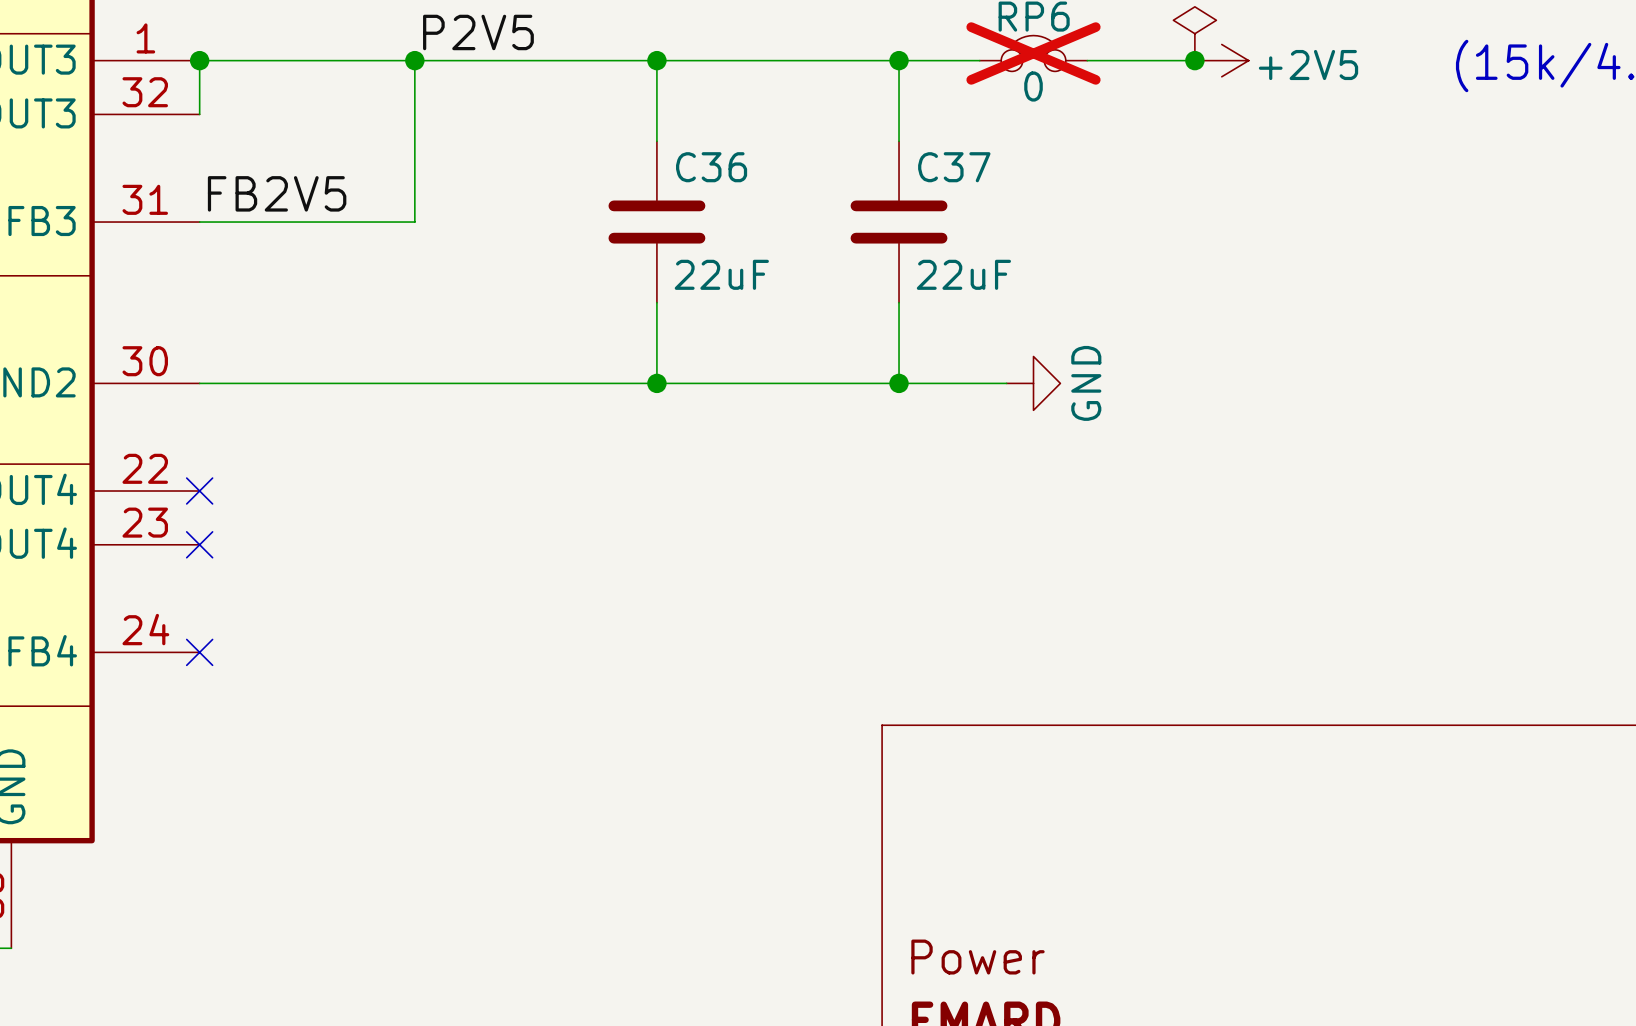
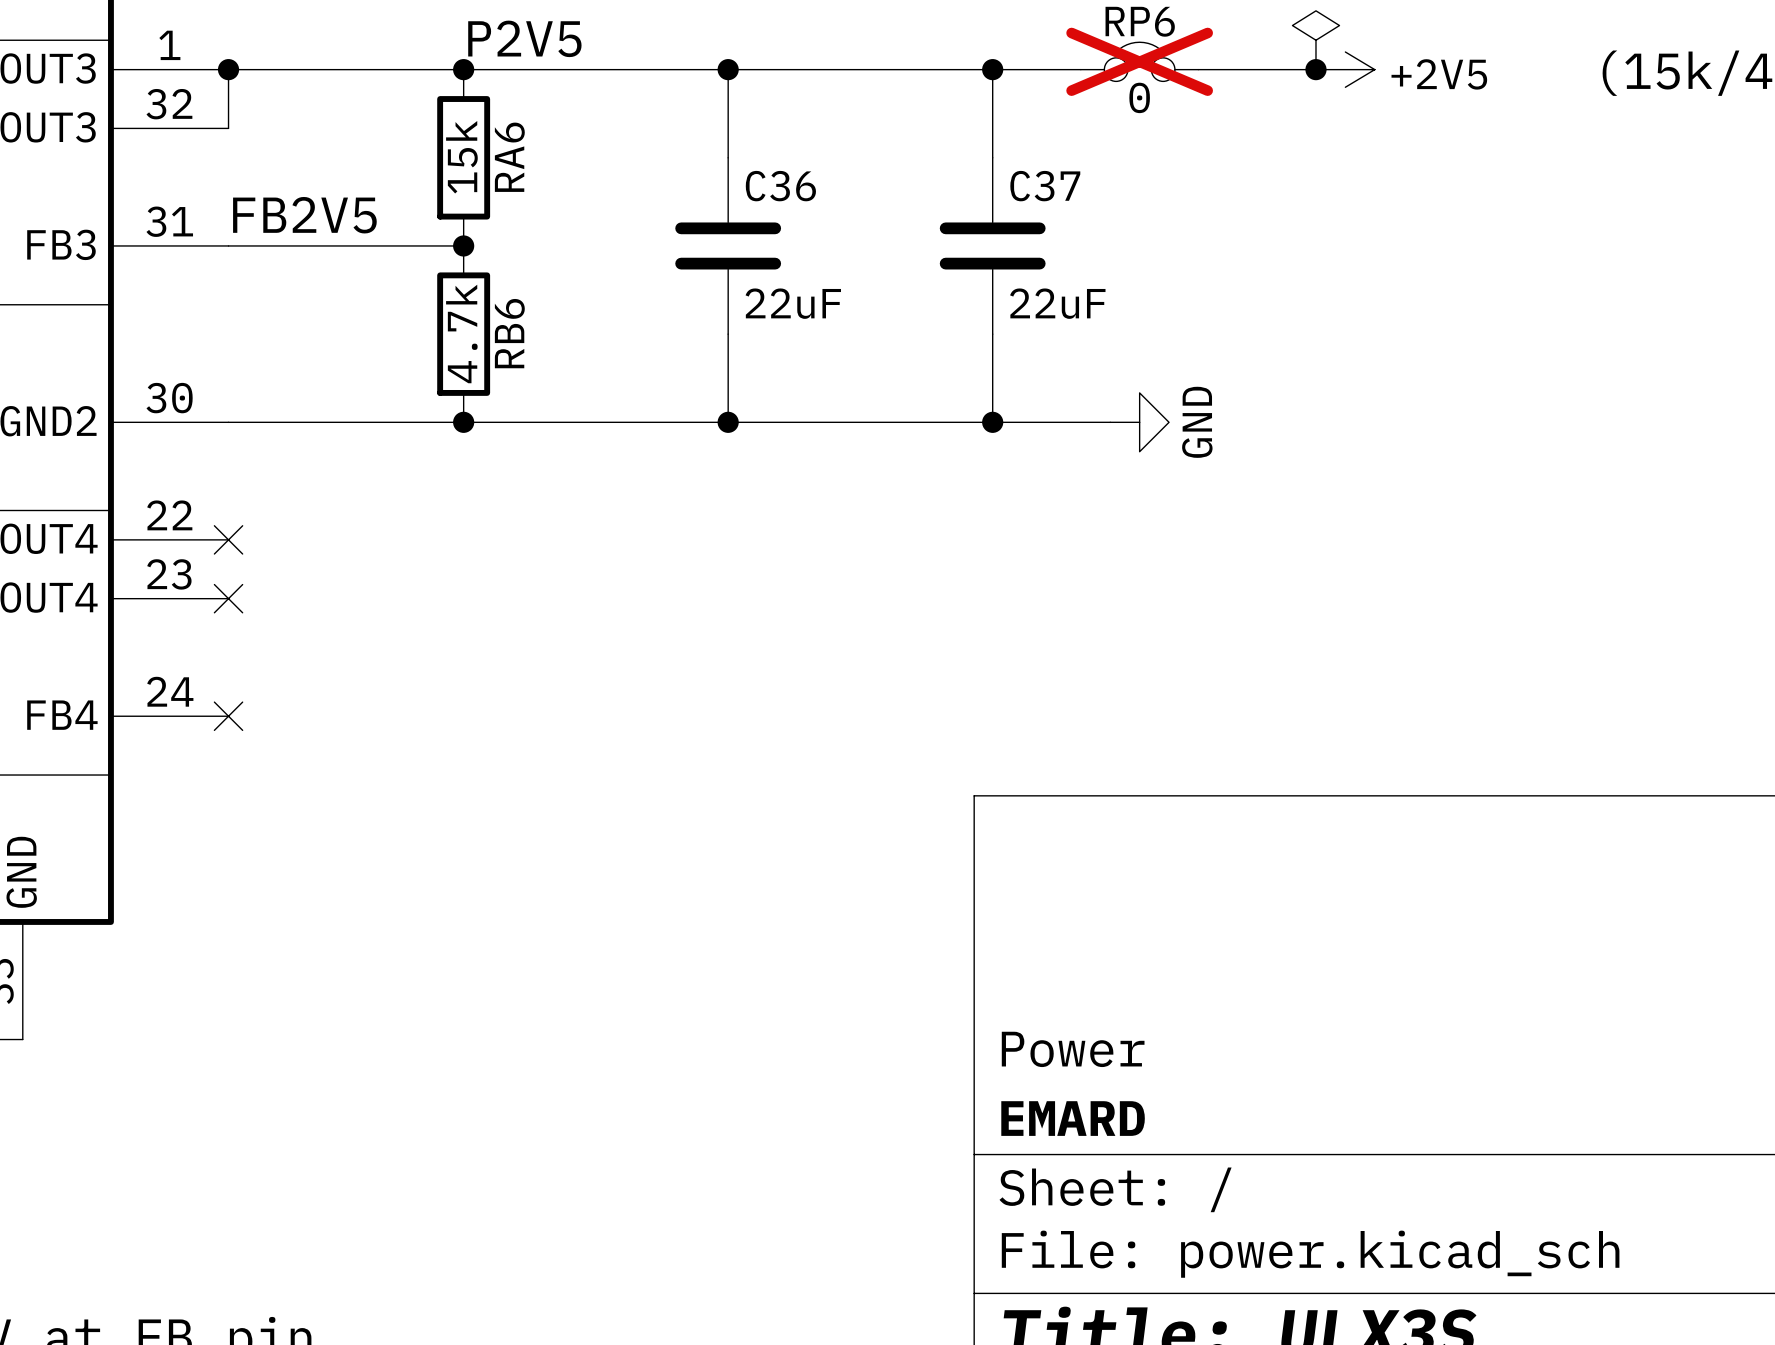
wire: (414, 60) (414, 222) -> none
RA6: none -> 15k (463, 157)
junction: none -> (463, 245)
RB6: none -> 4.7k (463, 334)
junction: none -> (463, 422)

